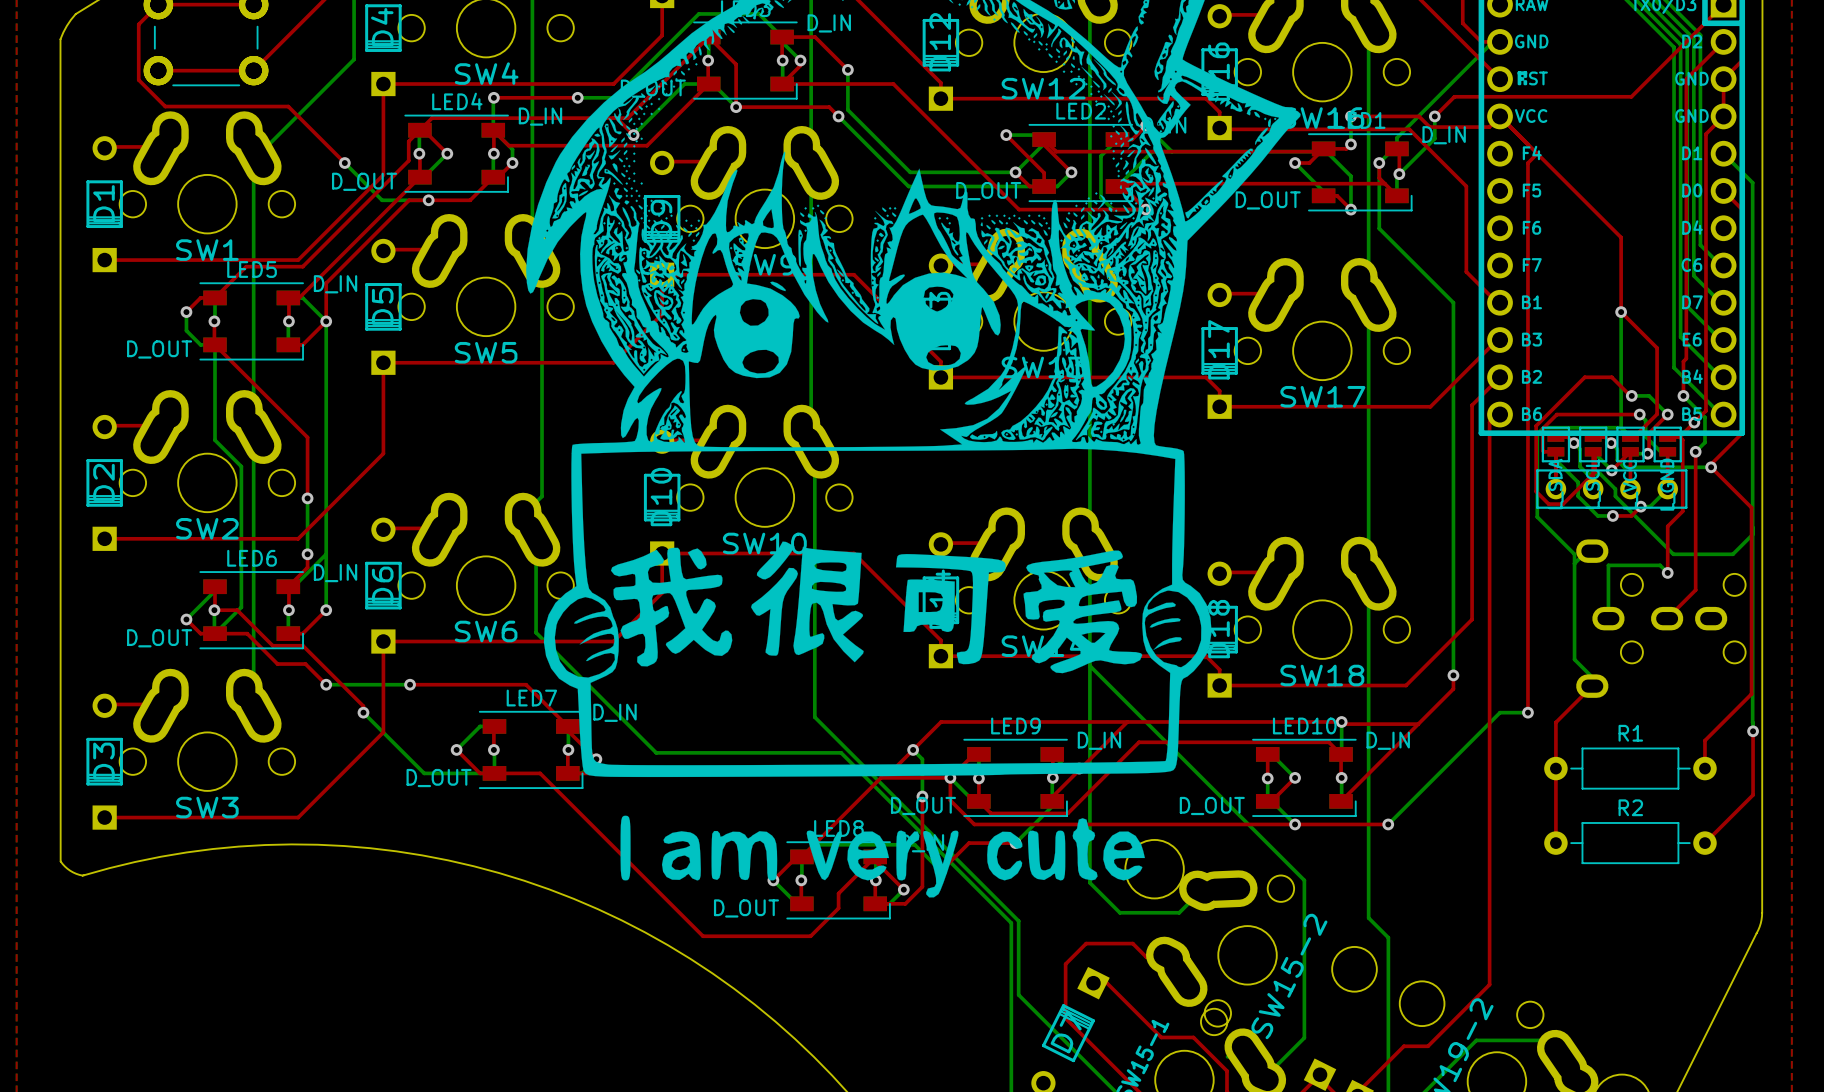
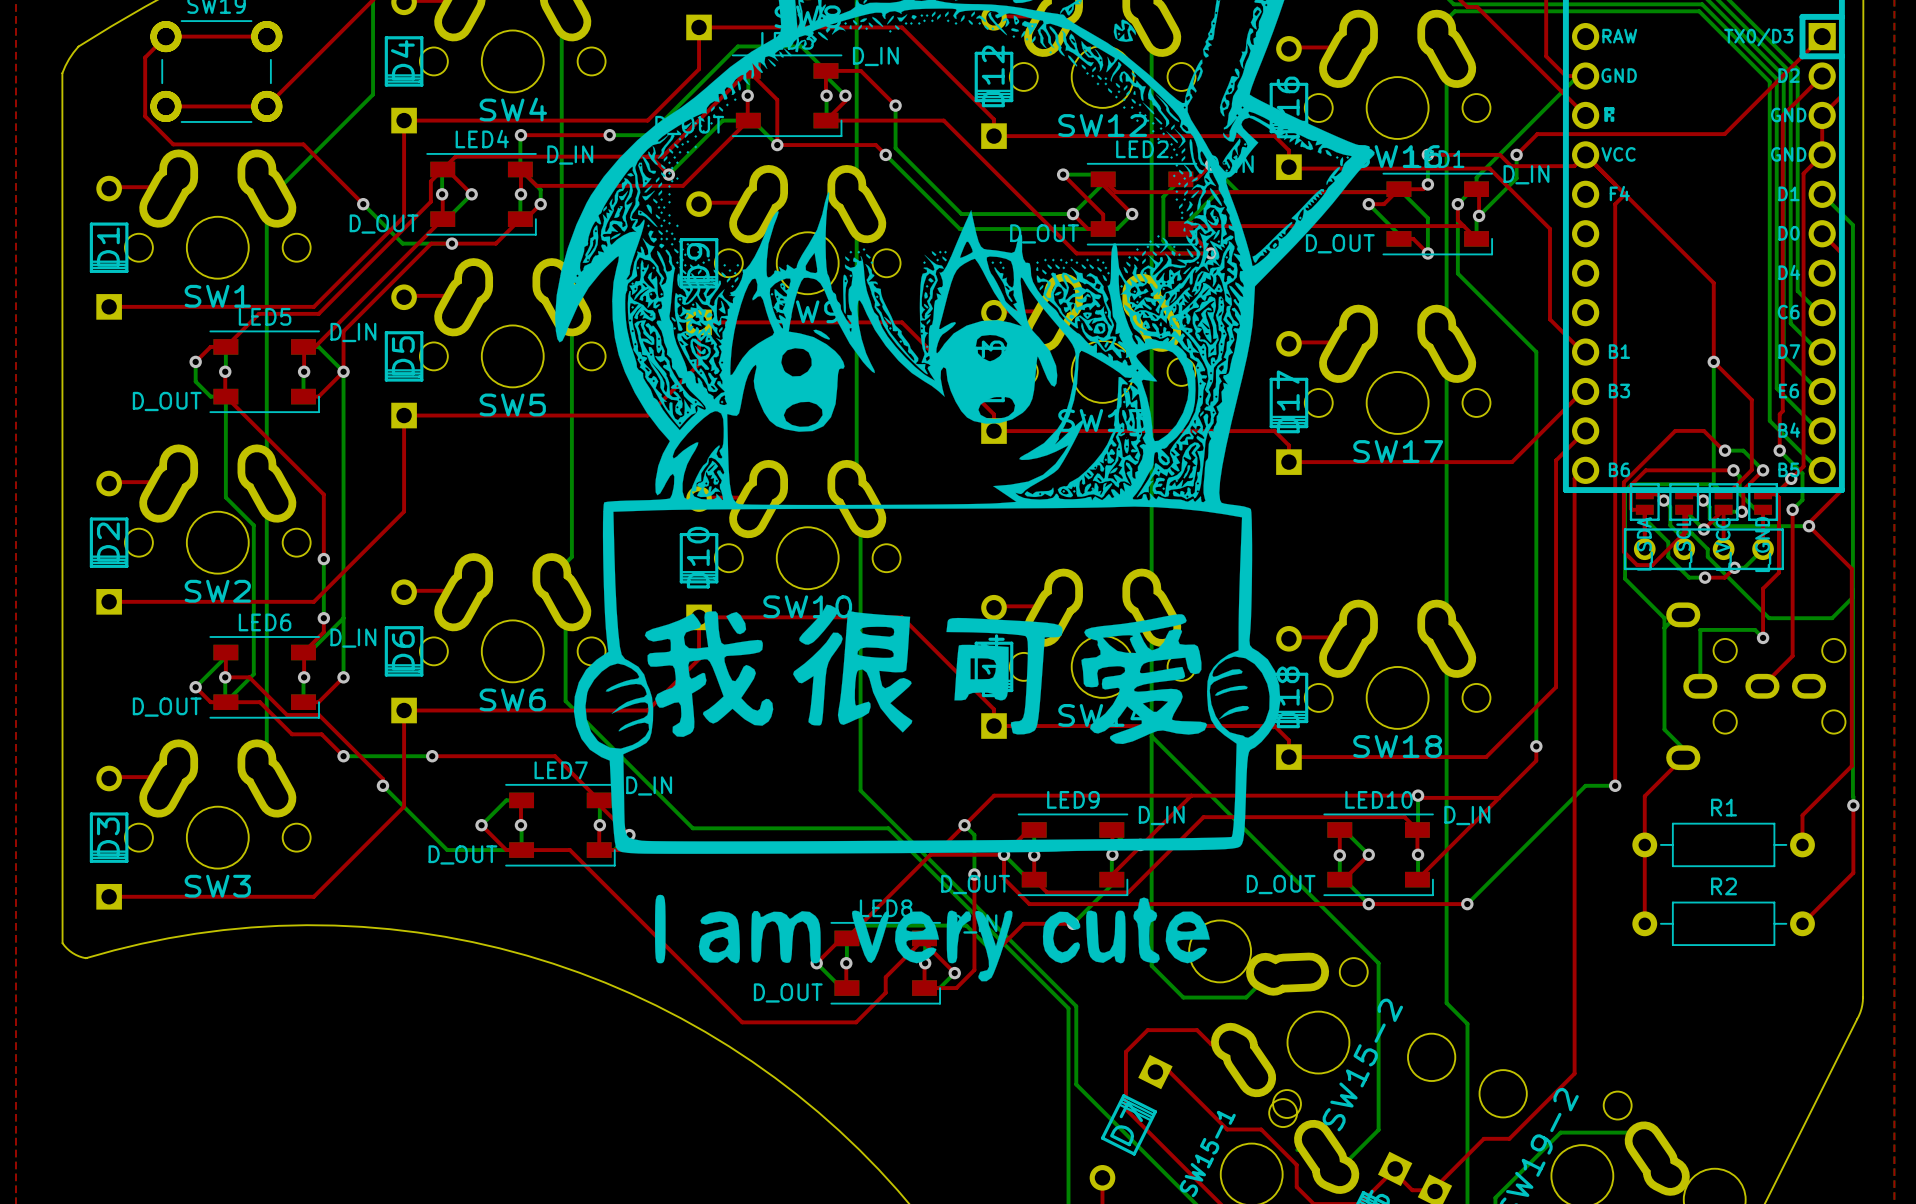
part text: ST (1538, 78) -> none
part text: F5 (1531, 190) -> none
part text: F6 (1531, 227) -> none
part text: F7 (1532, 265) -> none
part text: B2 (1531, 376) -> none

